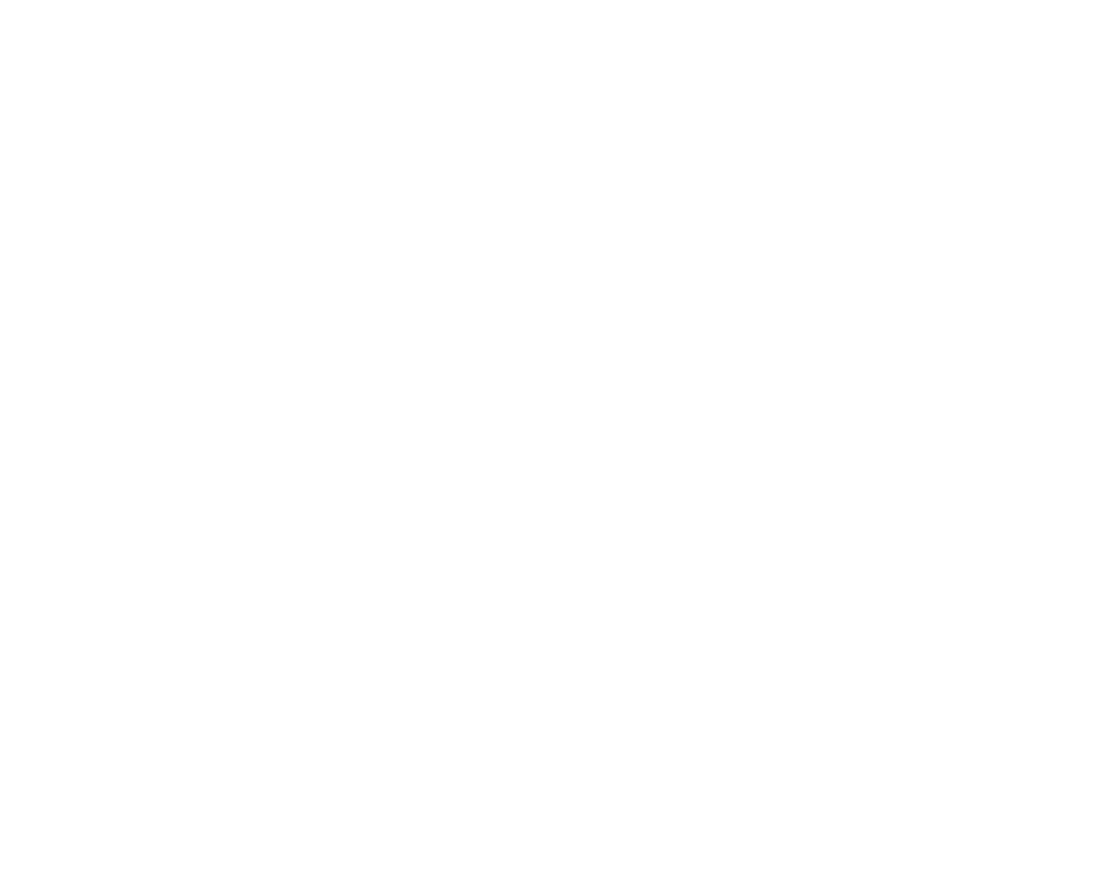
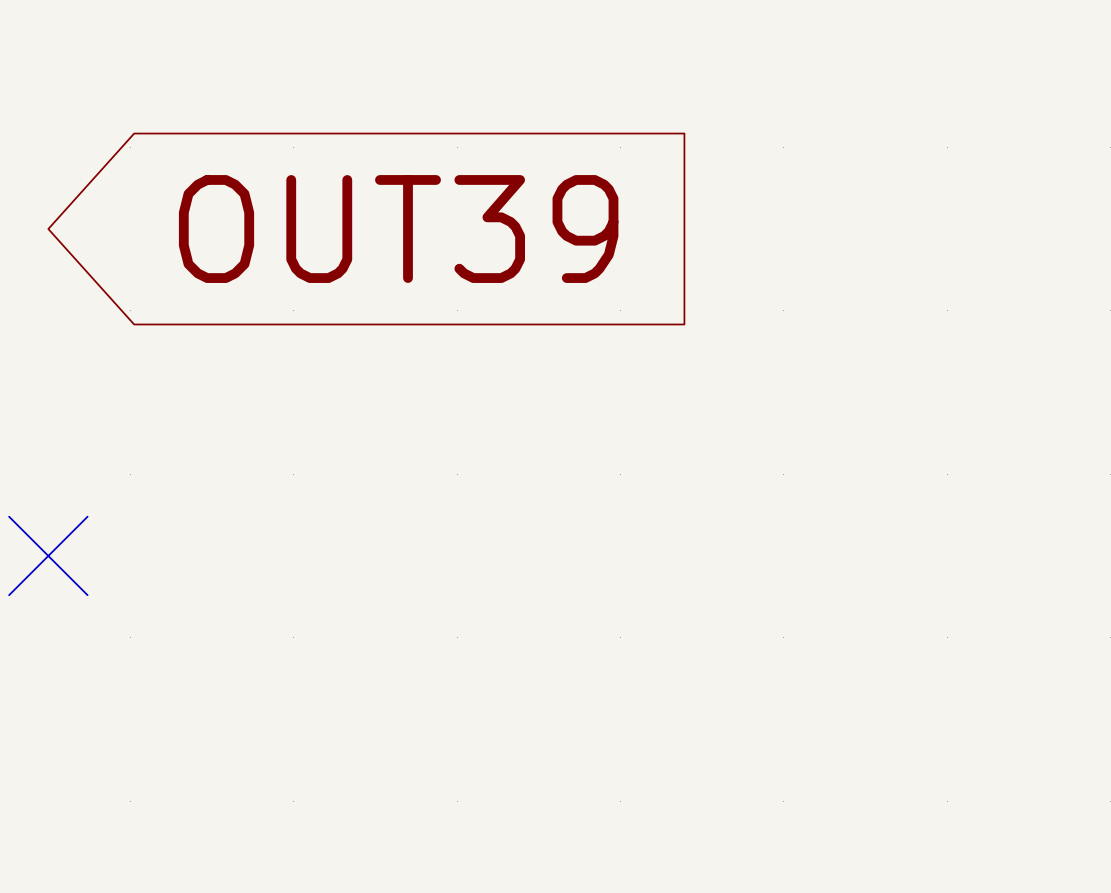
global label: none -> OUT39 (398, 229)
no-connect mark: none -> (48, 555)

